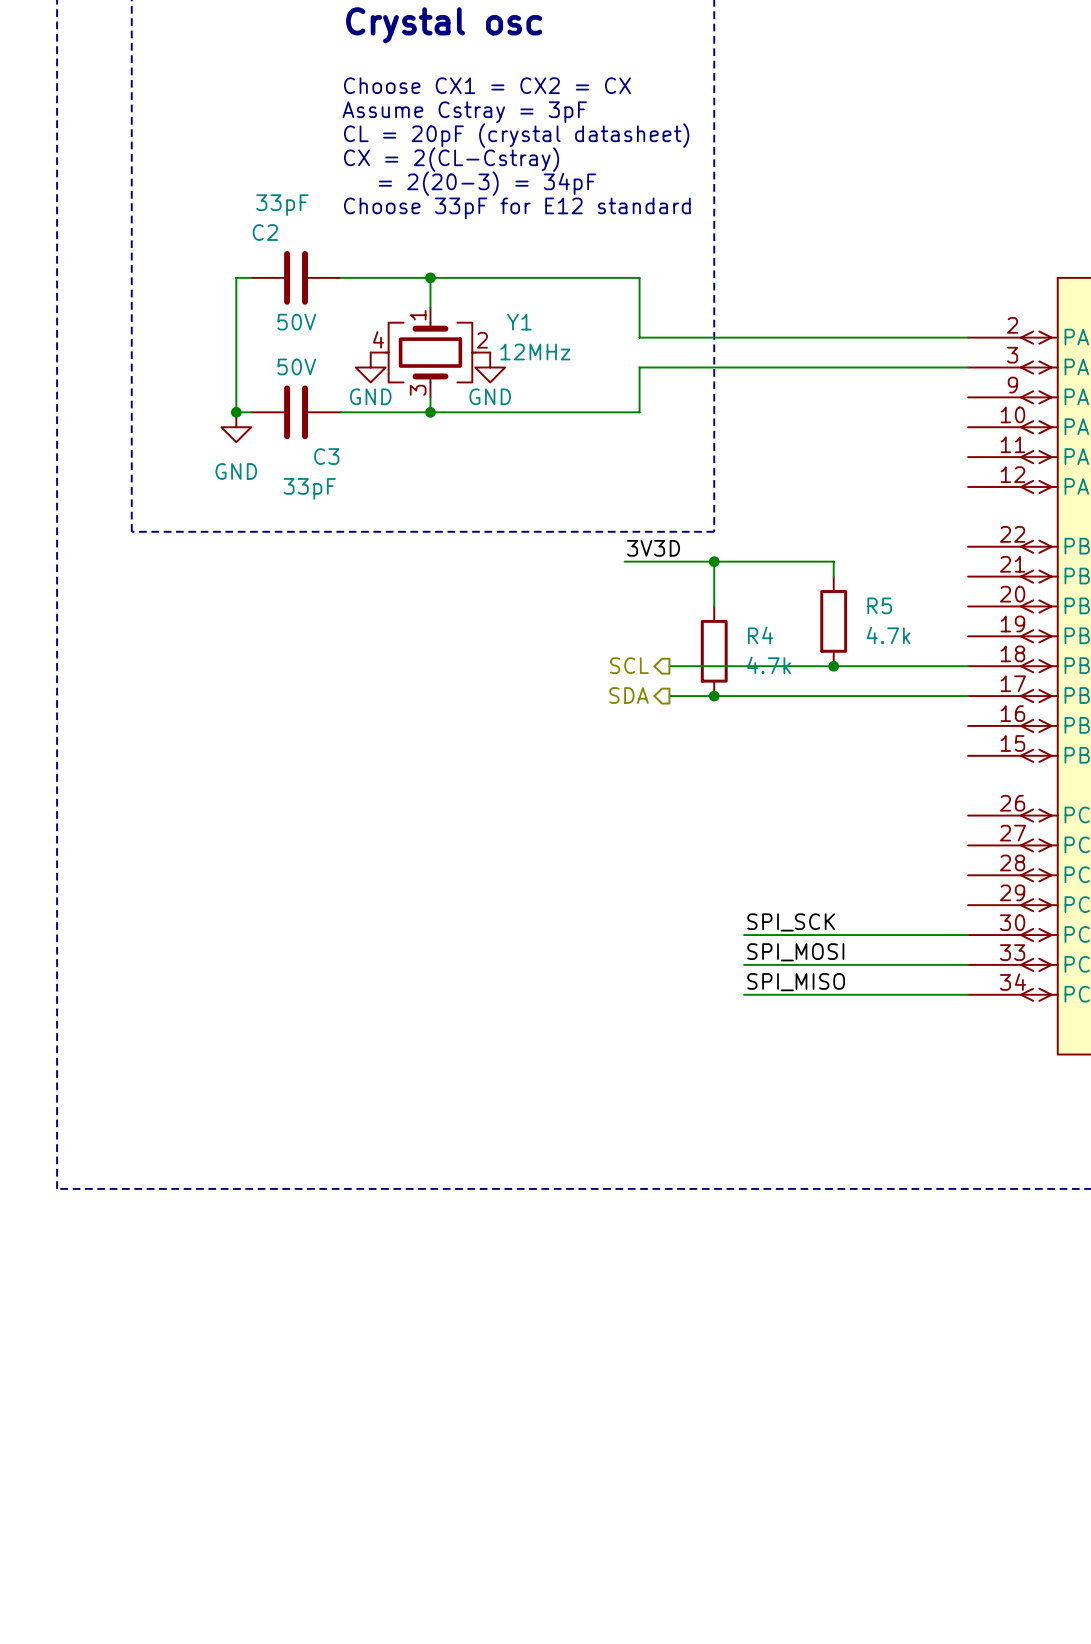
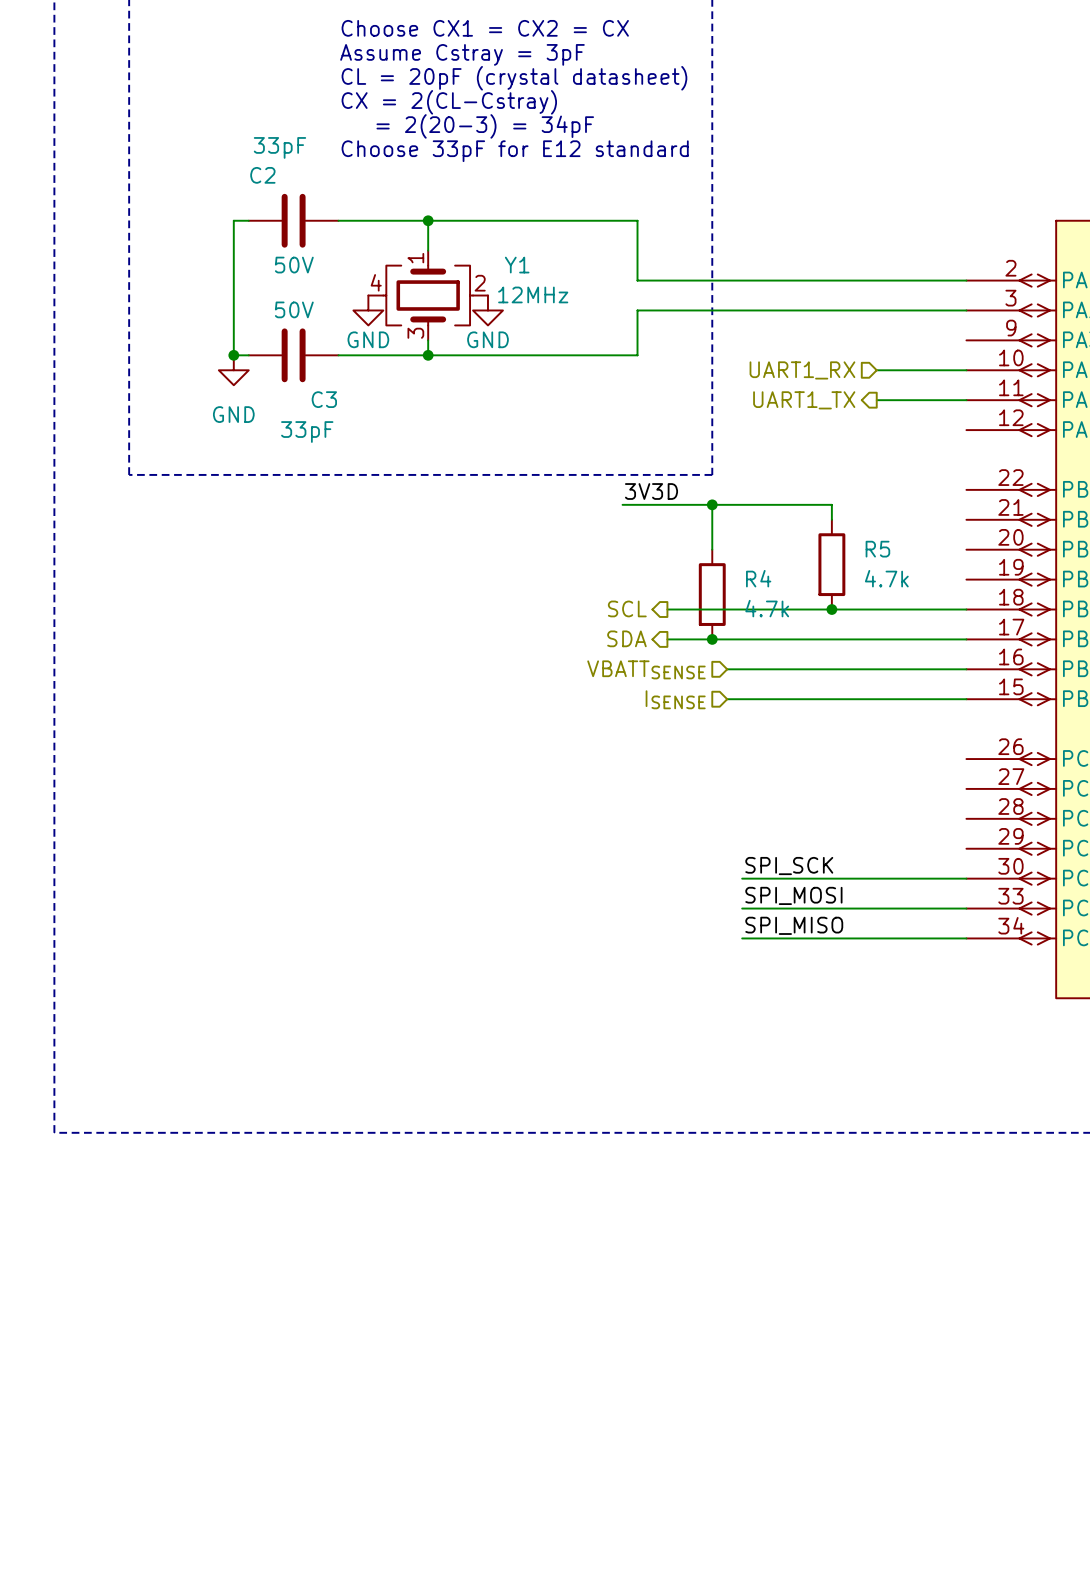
hierarchical label: none -> UART1_RX (802, 370)
wire: none -> (876, 370) (966, 370)
hierarchical label: none -> UART1_TX (804, 400)
wire: none -> (876, 400) (966, 400)
wire: none -> (727, 669) (966, 669)
hierarchical label: none -> VBATTSENSE (646, 669)
wire: none -> (727, 699) (966, 699)
hierarchical label: none -> ISENSE (675, 699)

